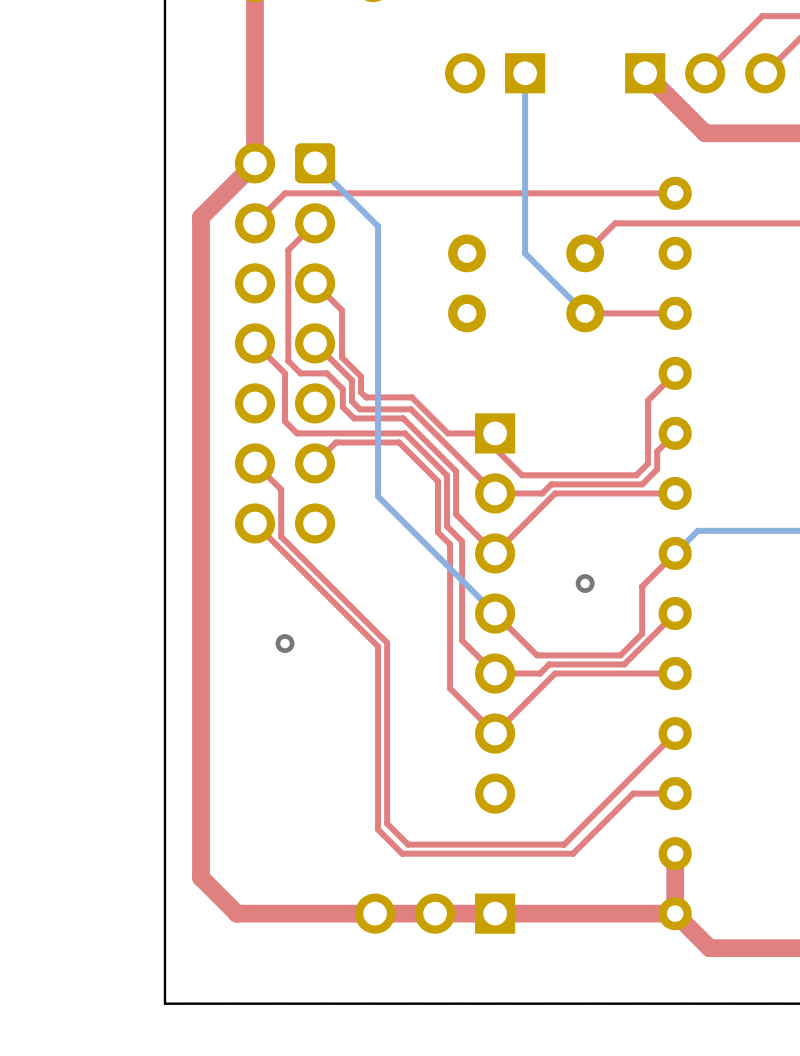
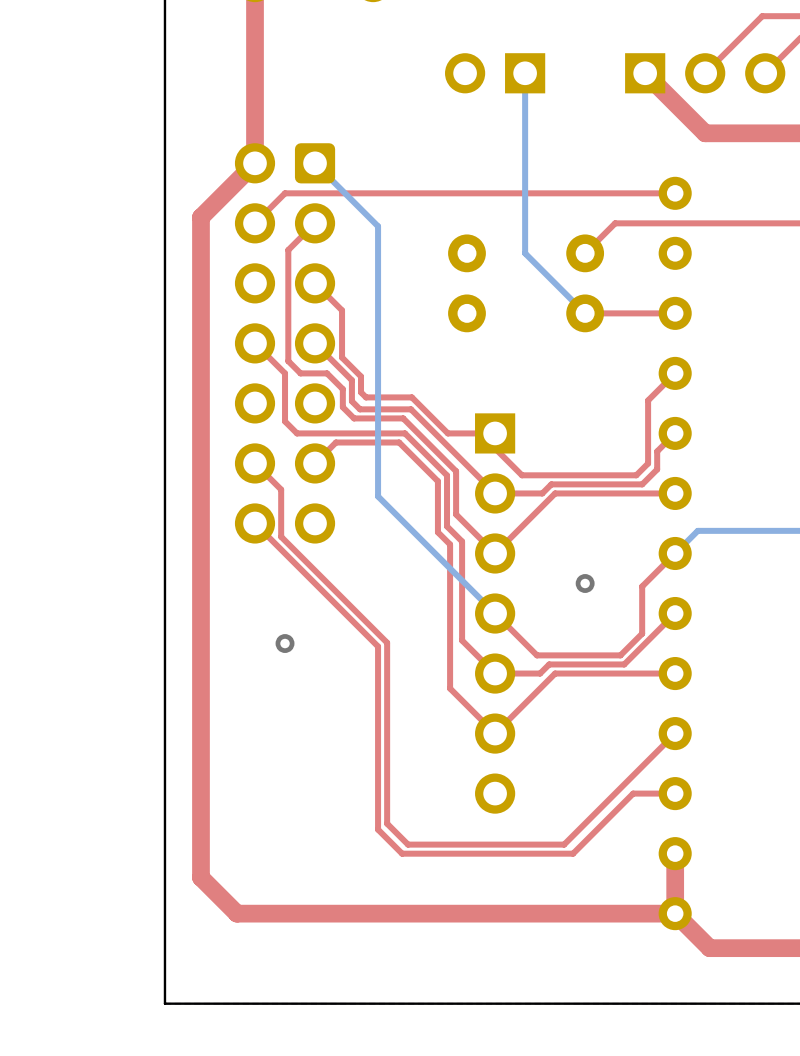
part: (435, 913) -> none

